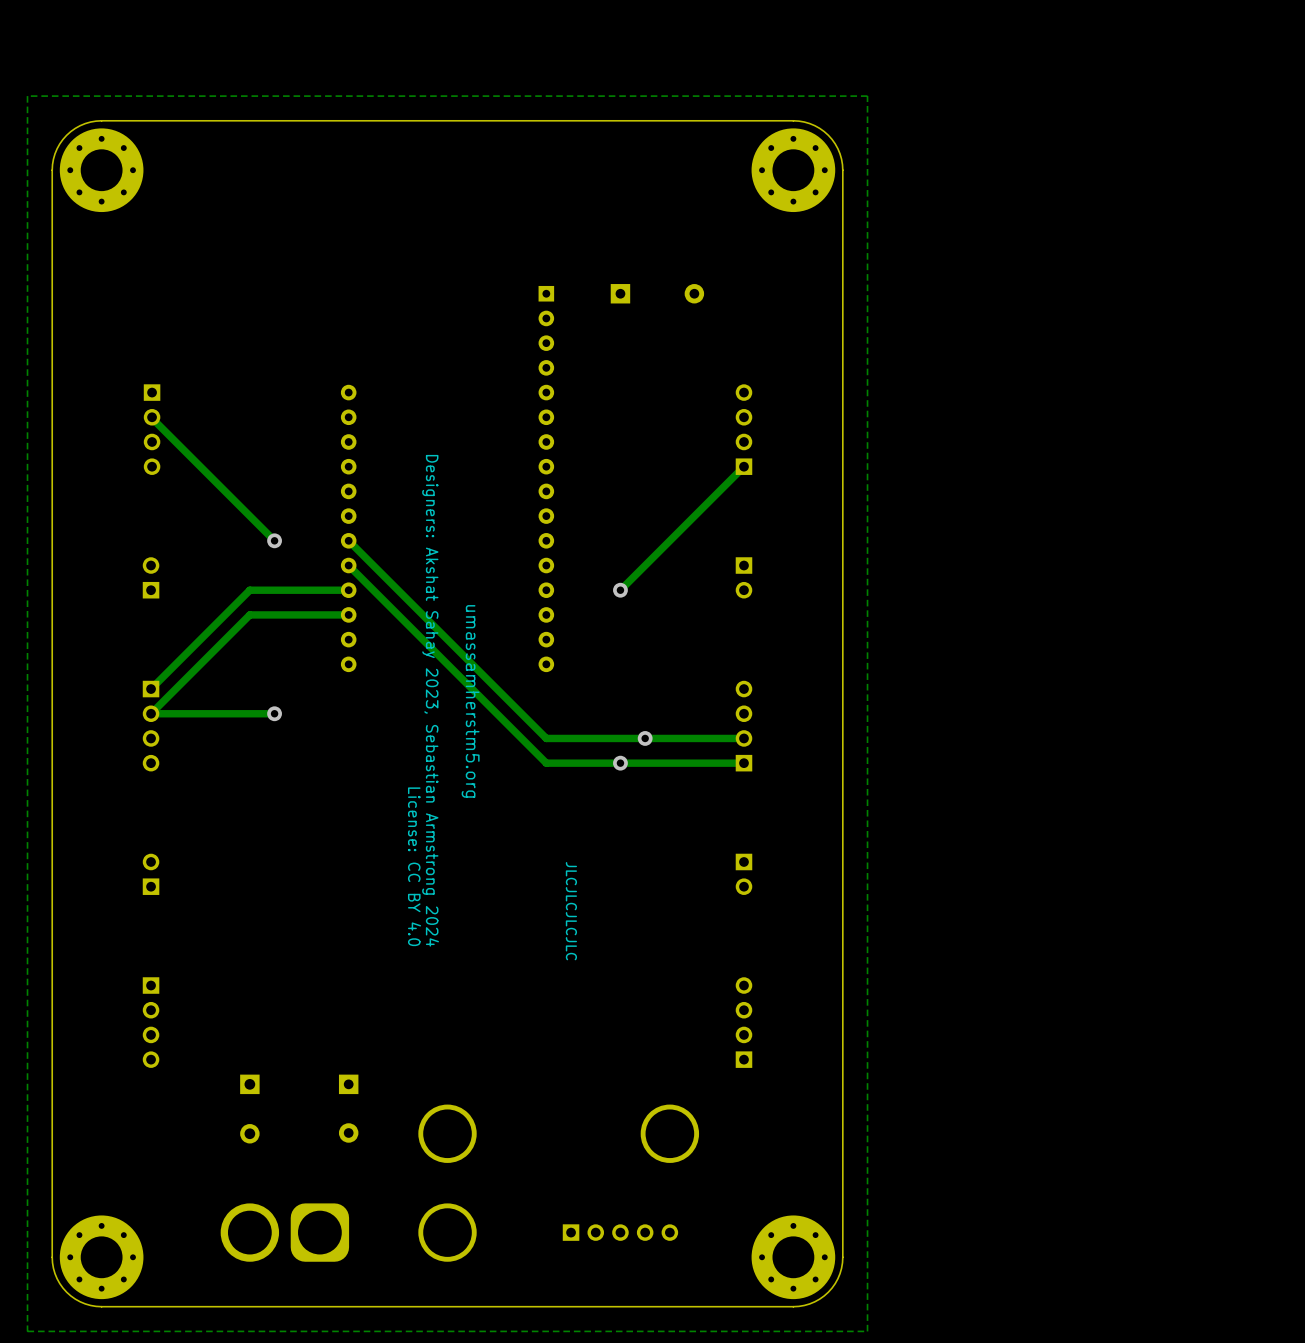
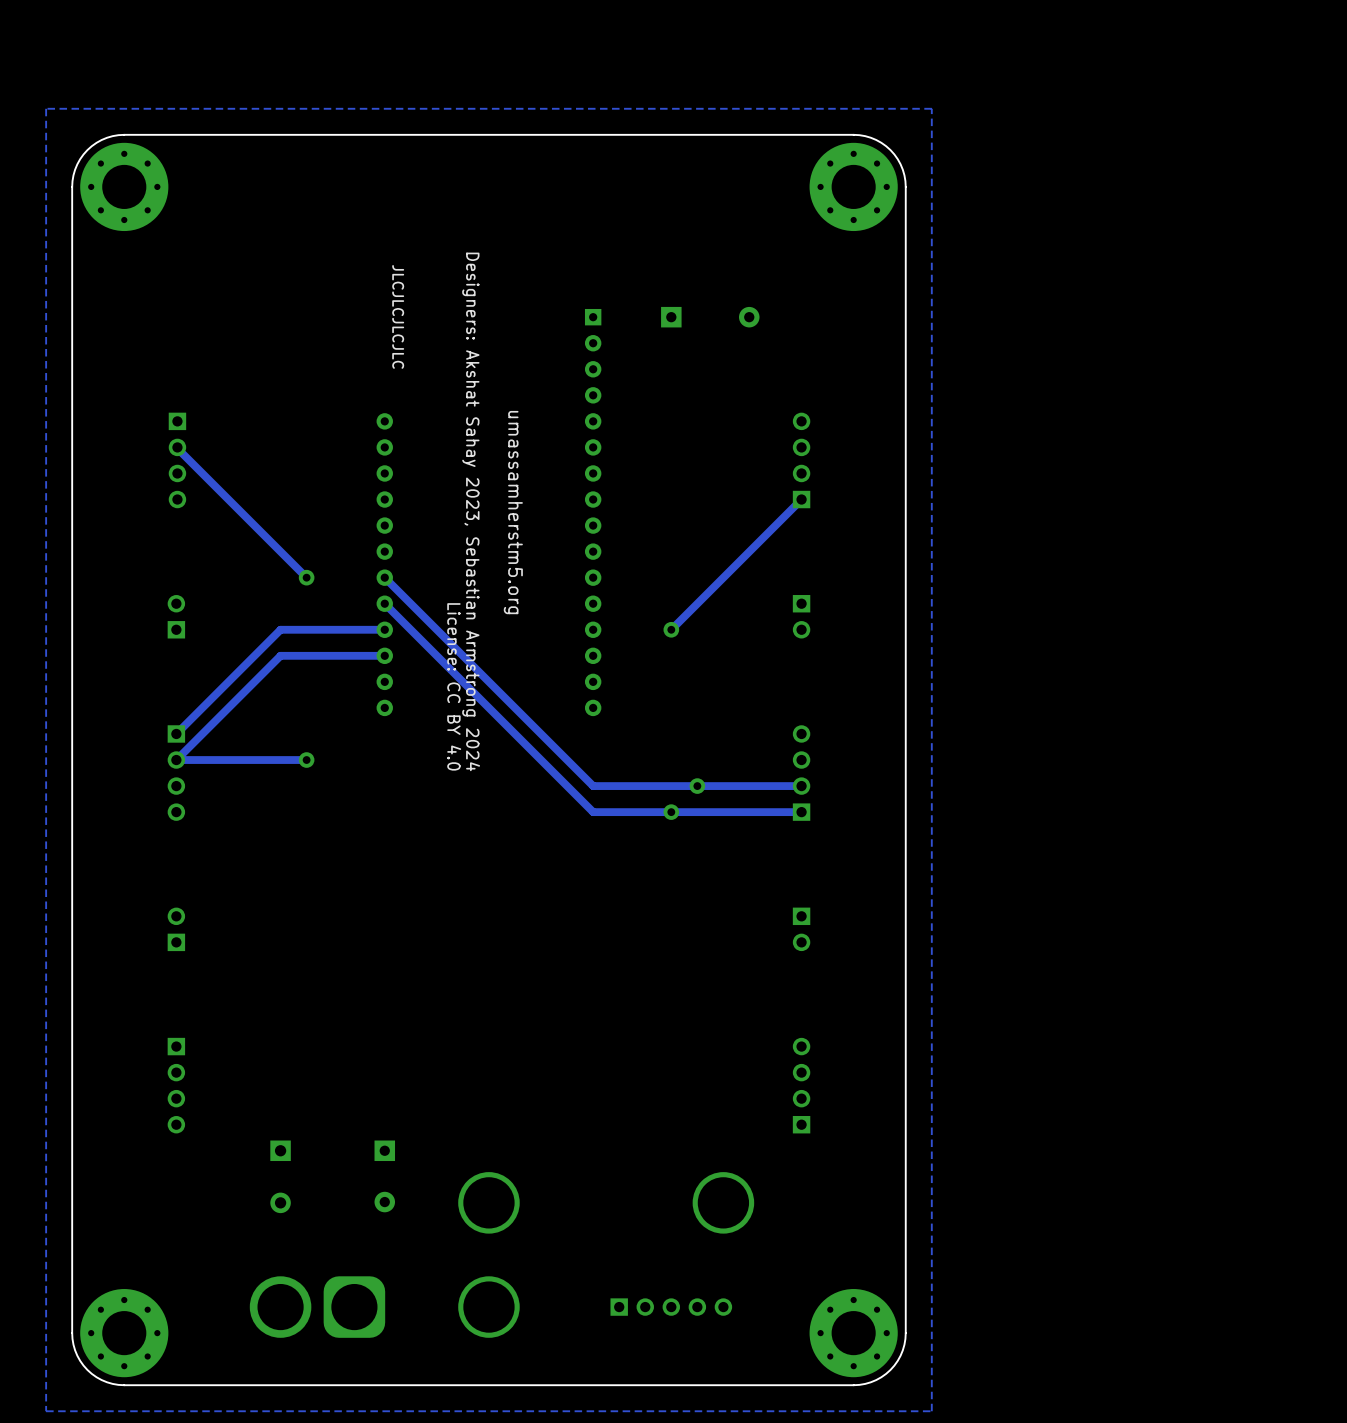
text: none -> JLCJLCJLCJLC (398, 316)
text position: Designers: Akshat Sahay 2023, Sebastian Armstrong 2024 (430, 700) -> Designers: Akshat Sahay 2023, Sebastian Armstrong 2024 (471, 511)
text position: umassamherstm5.org (470, 701) -> umassamherstm5.org (513, 512)
text position: License: CC BY 4.0 (414, 866) -> License: CC BY 4.0 (454, 686)
text: JLCJLCJLCJLC (571, 911) -> none

